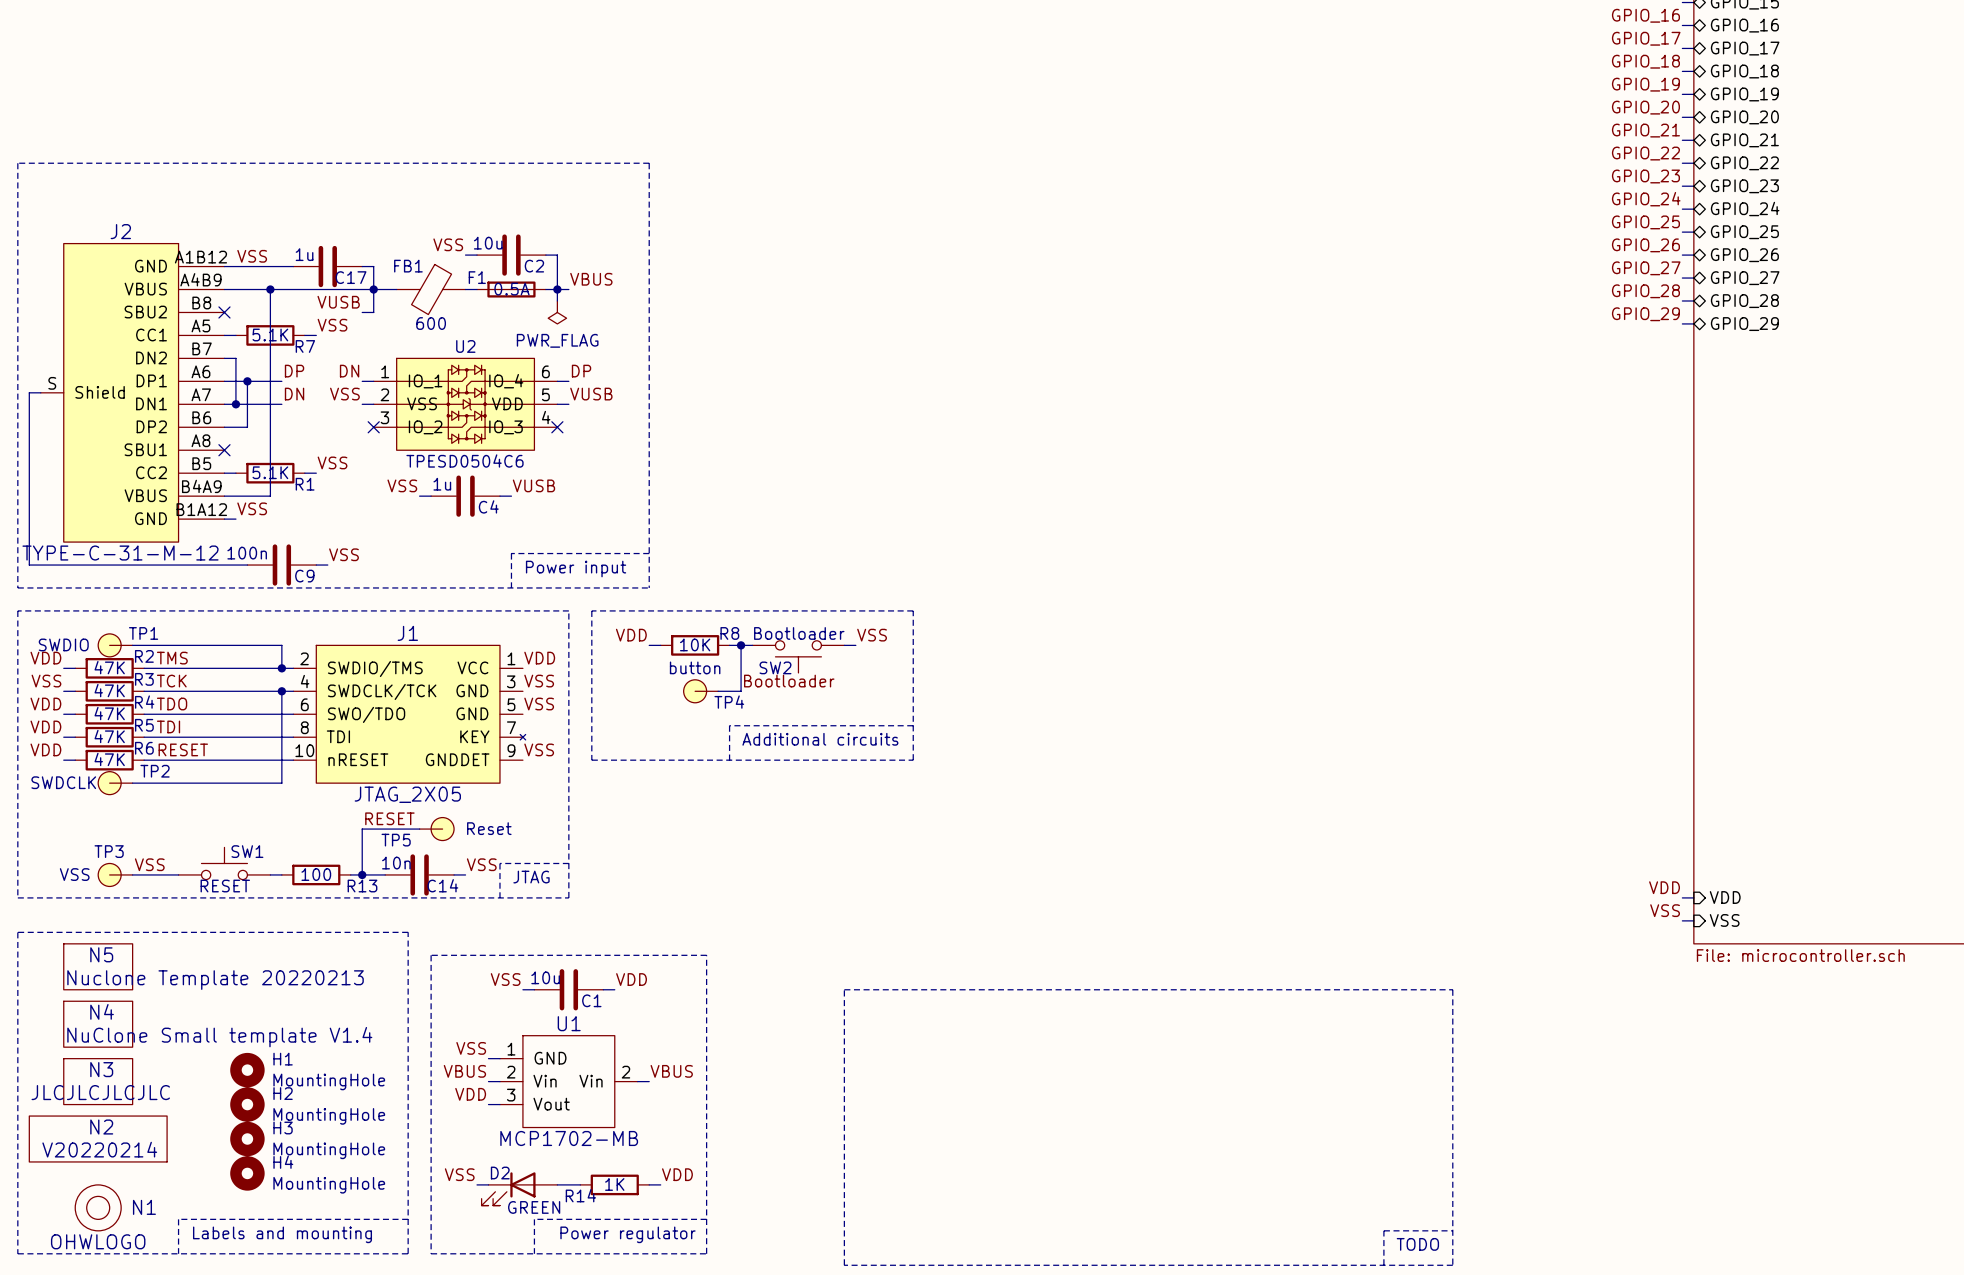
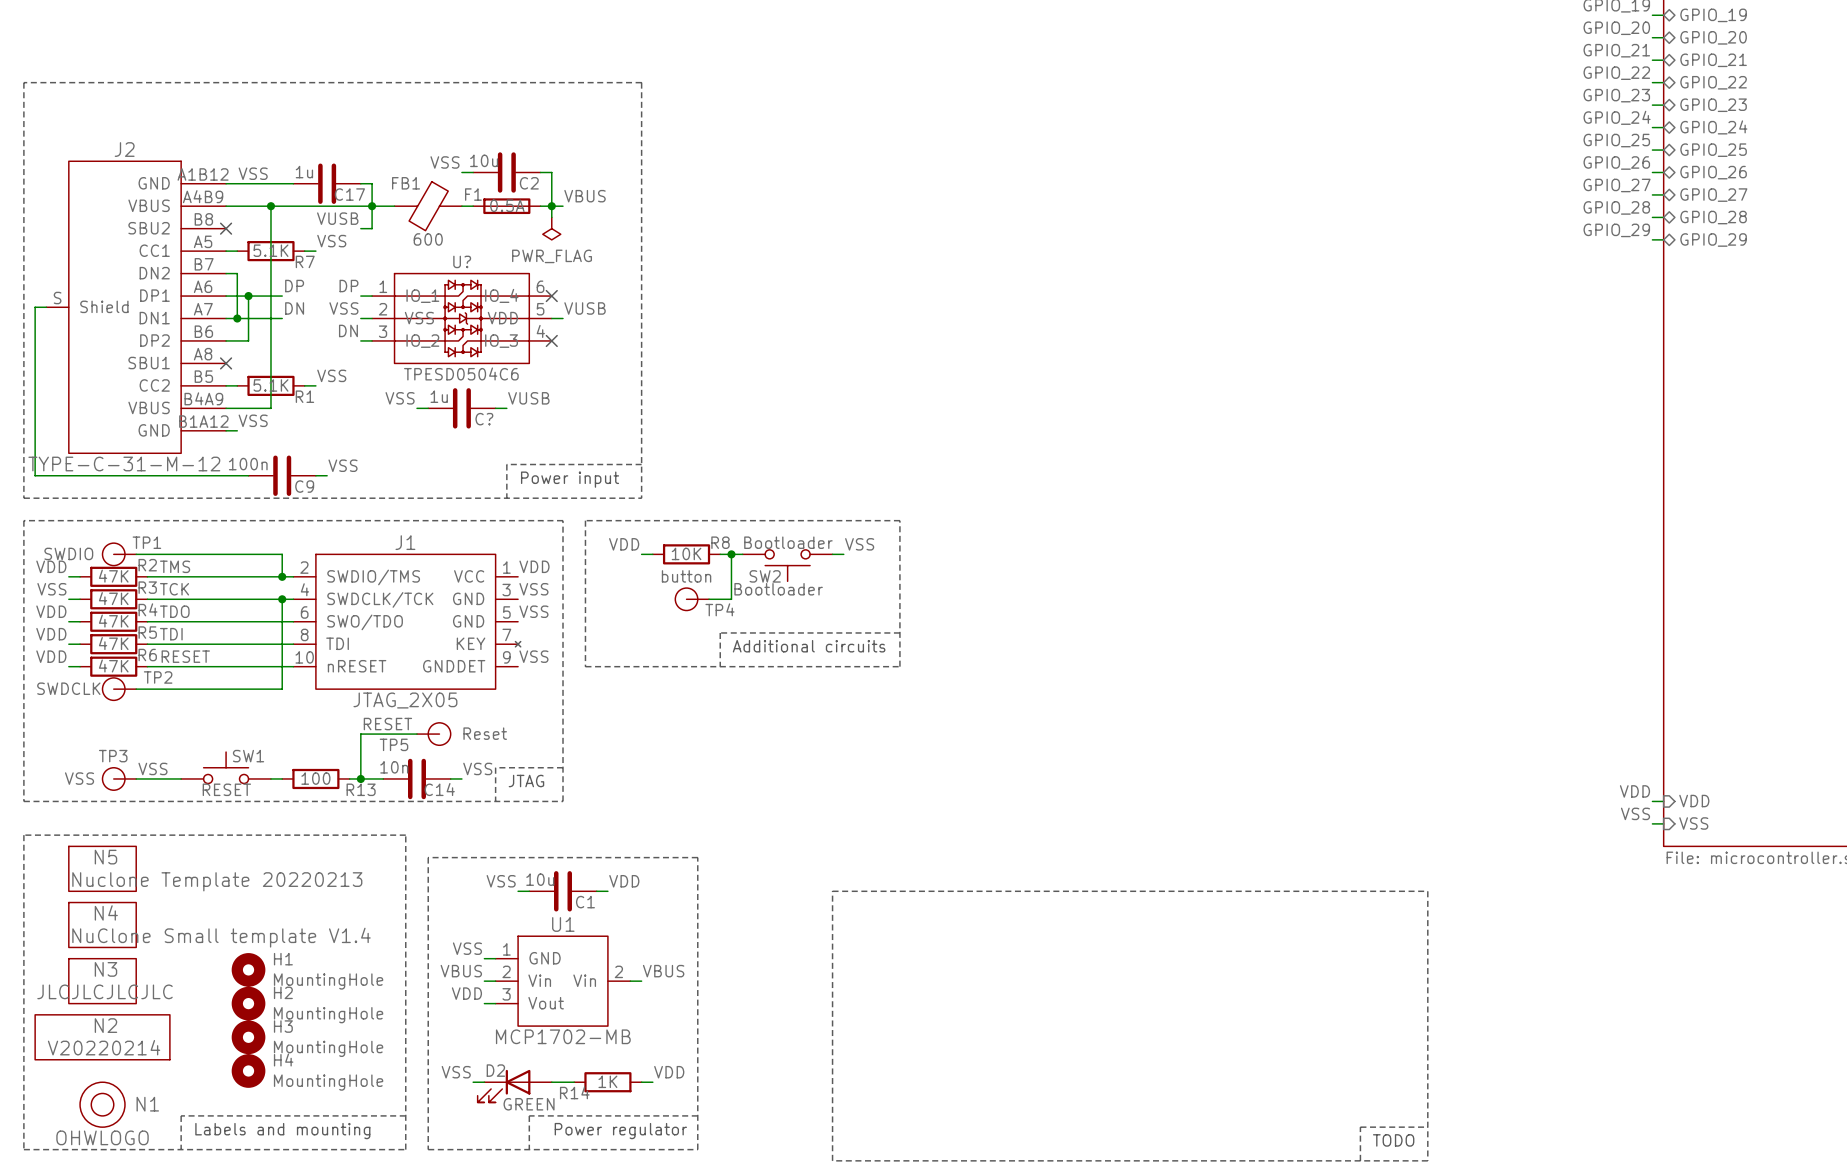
U2 name: U2 (465, 346) -> U? (462, 261)
label: DN (349, 371) -> DP (348, 286)
label: DP (581, 371) -> none
wire: (557, 381) (568, 381) -> (360, 340) (372, 340)
no-connect mark: none -> (551, 296)
label: none -> DN (348, 330)
no-connect mark: (373, 427) -> none
C4 name: C4 (488, 506) -> C? (484, 419)

